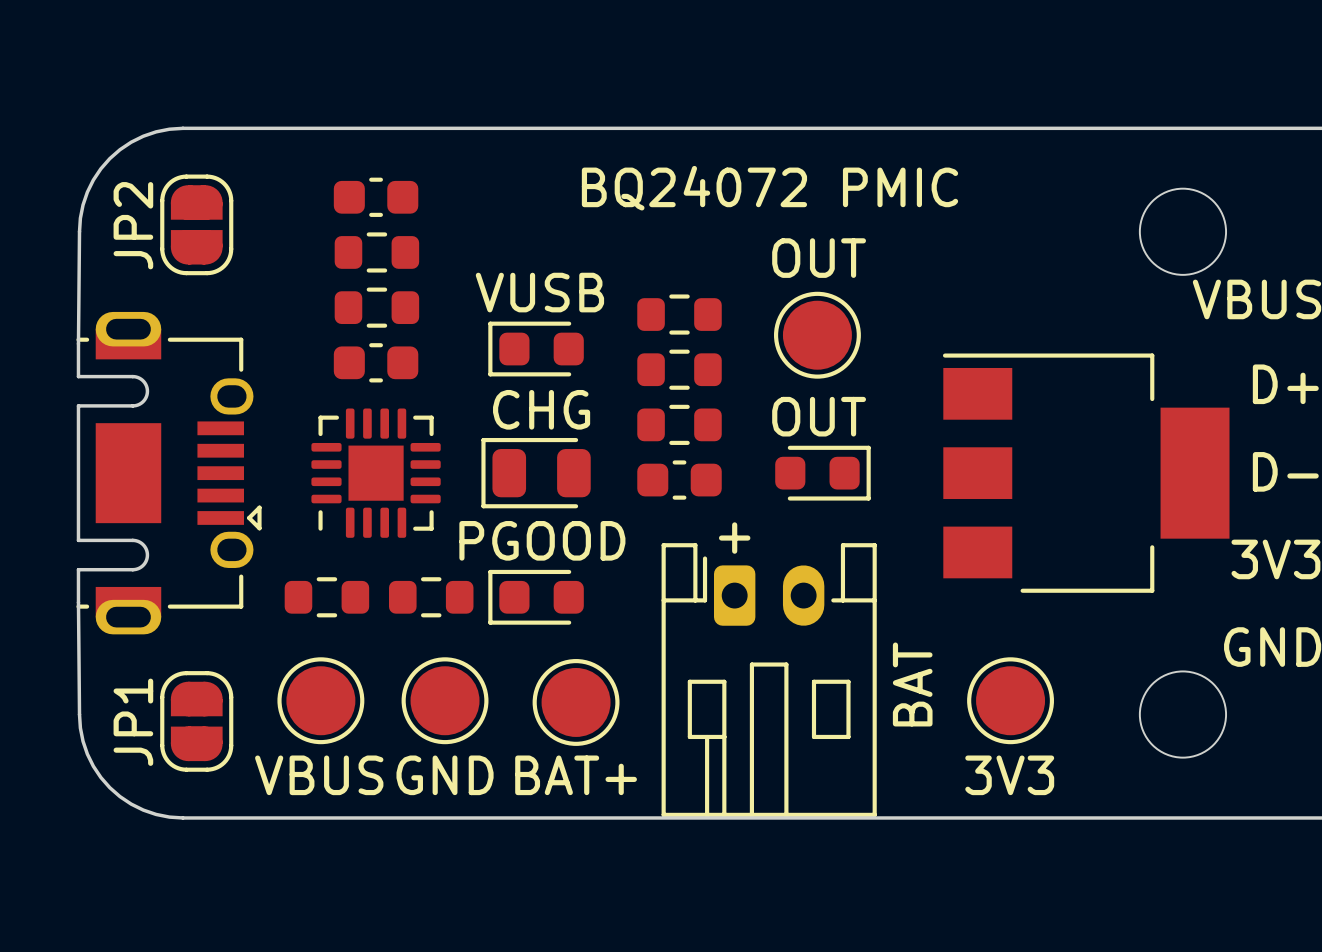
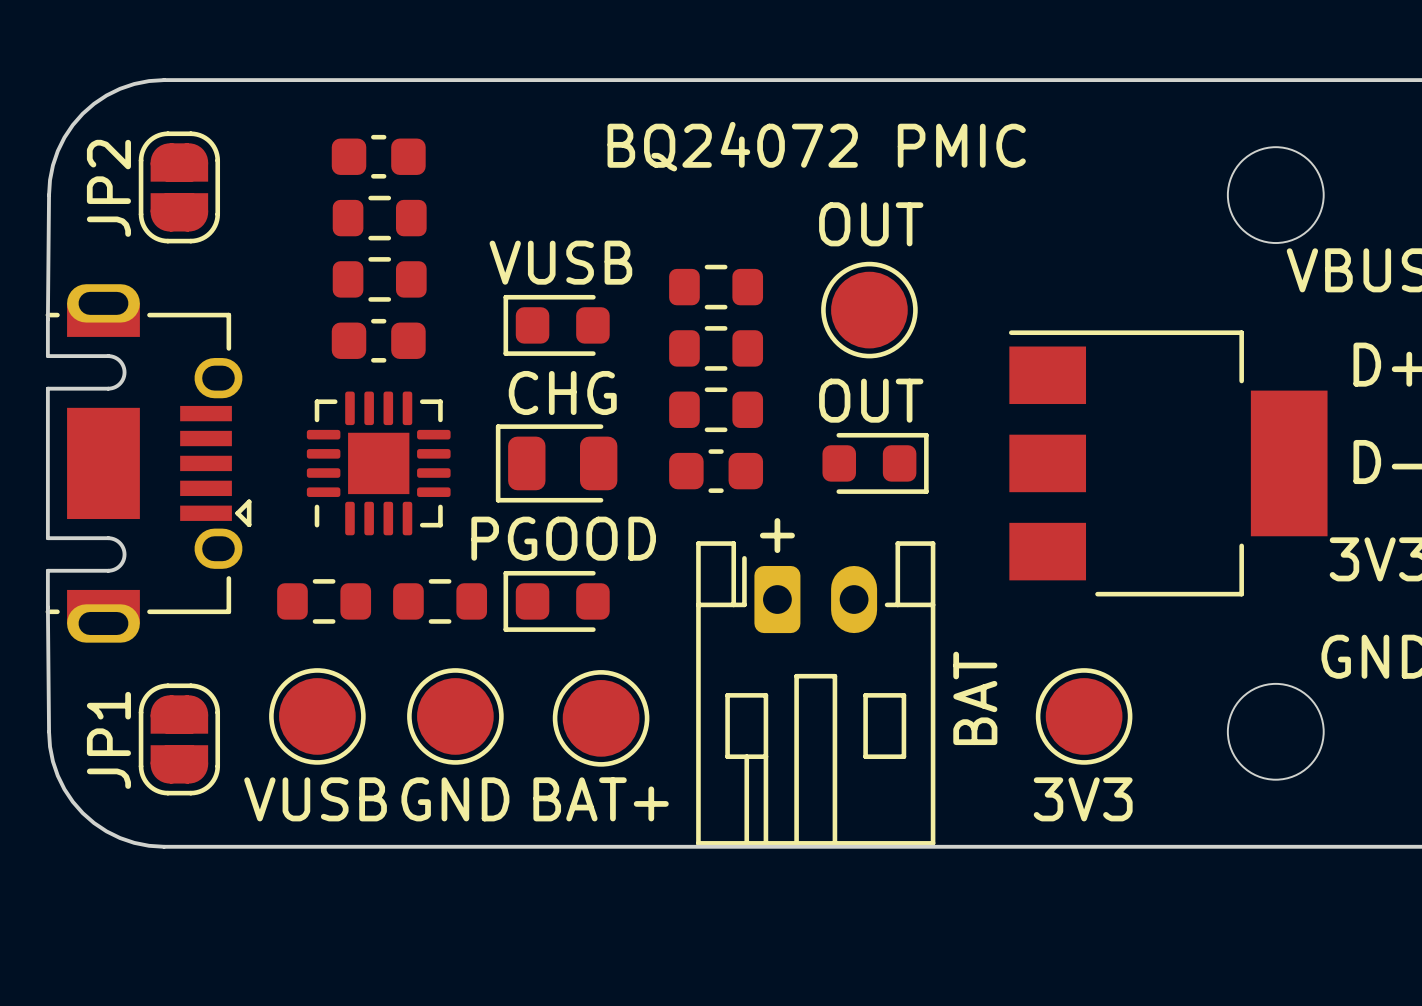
part value: VBUS (319, 775) -> VUSB (315, 799)

